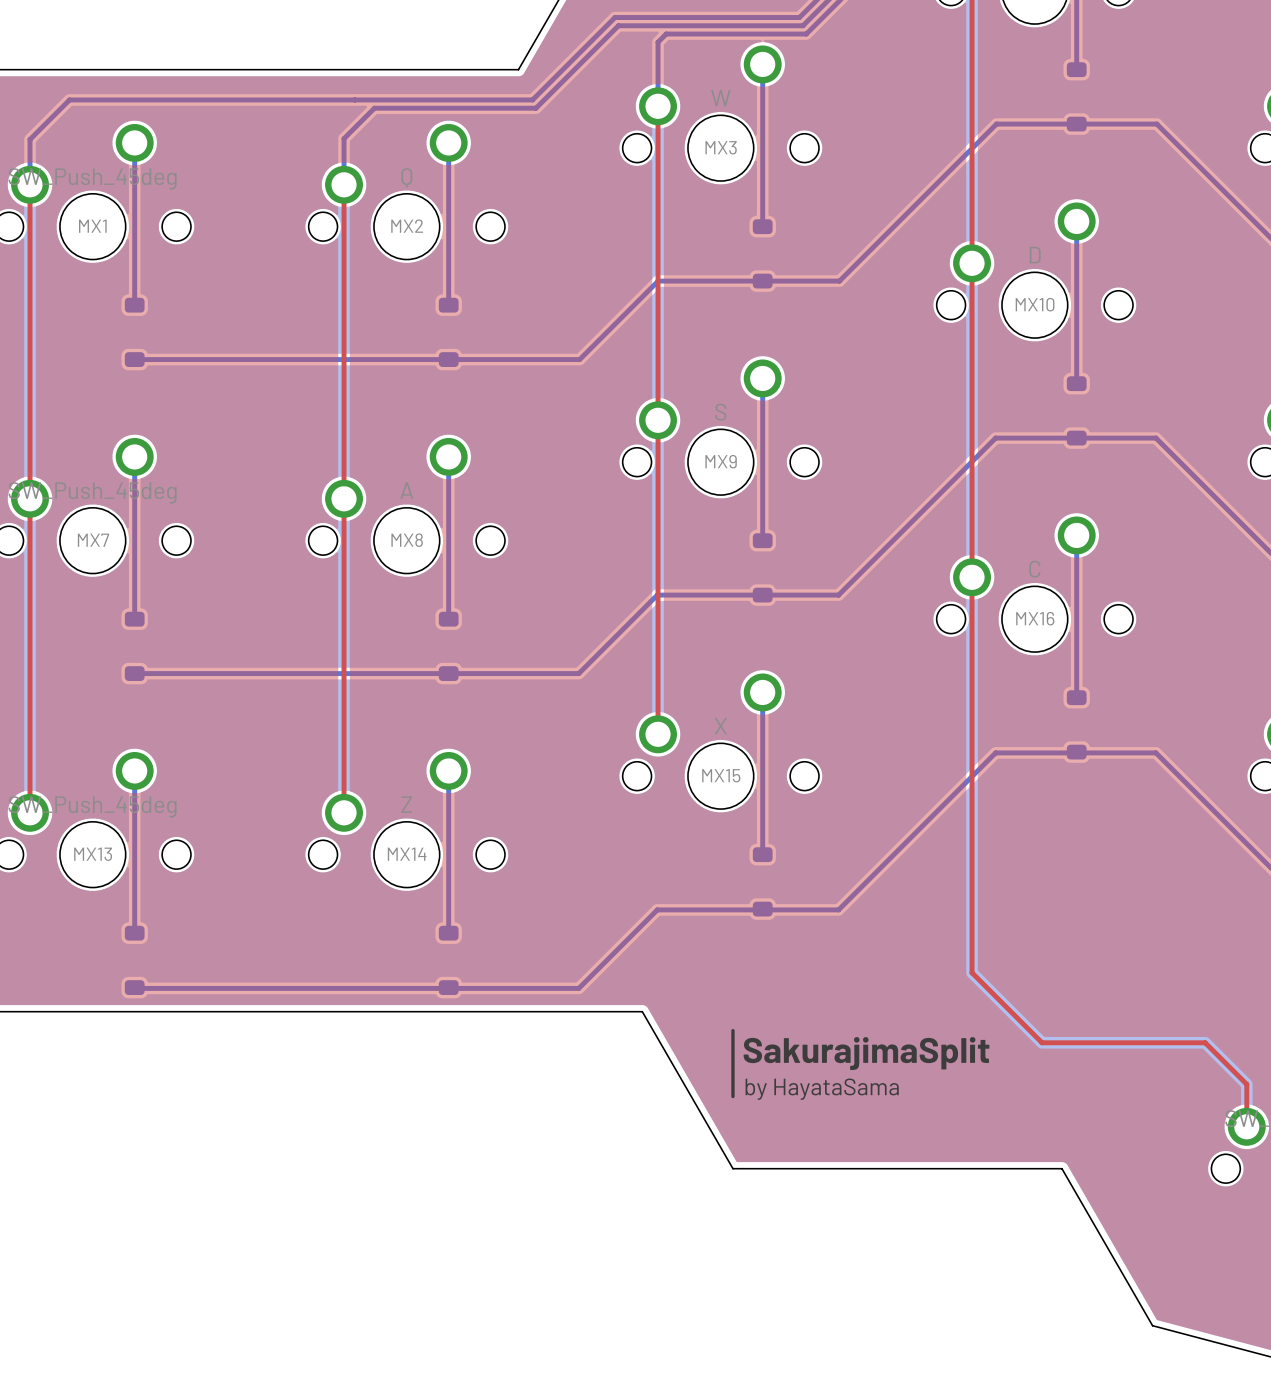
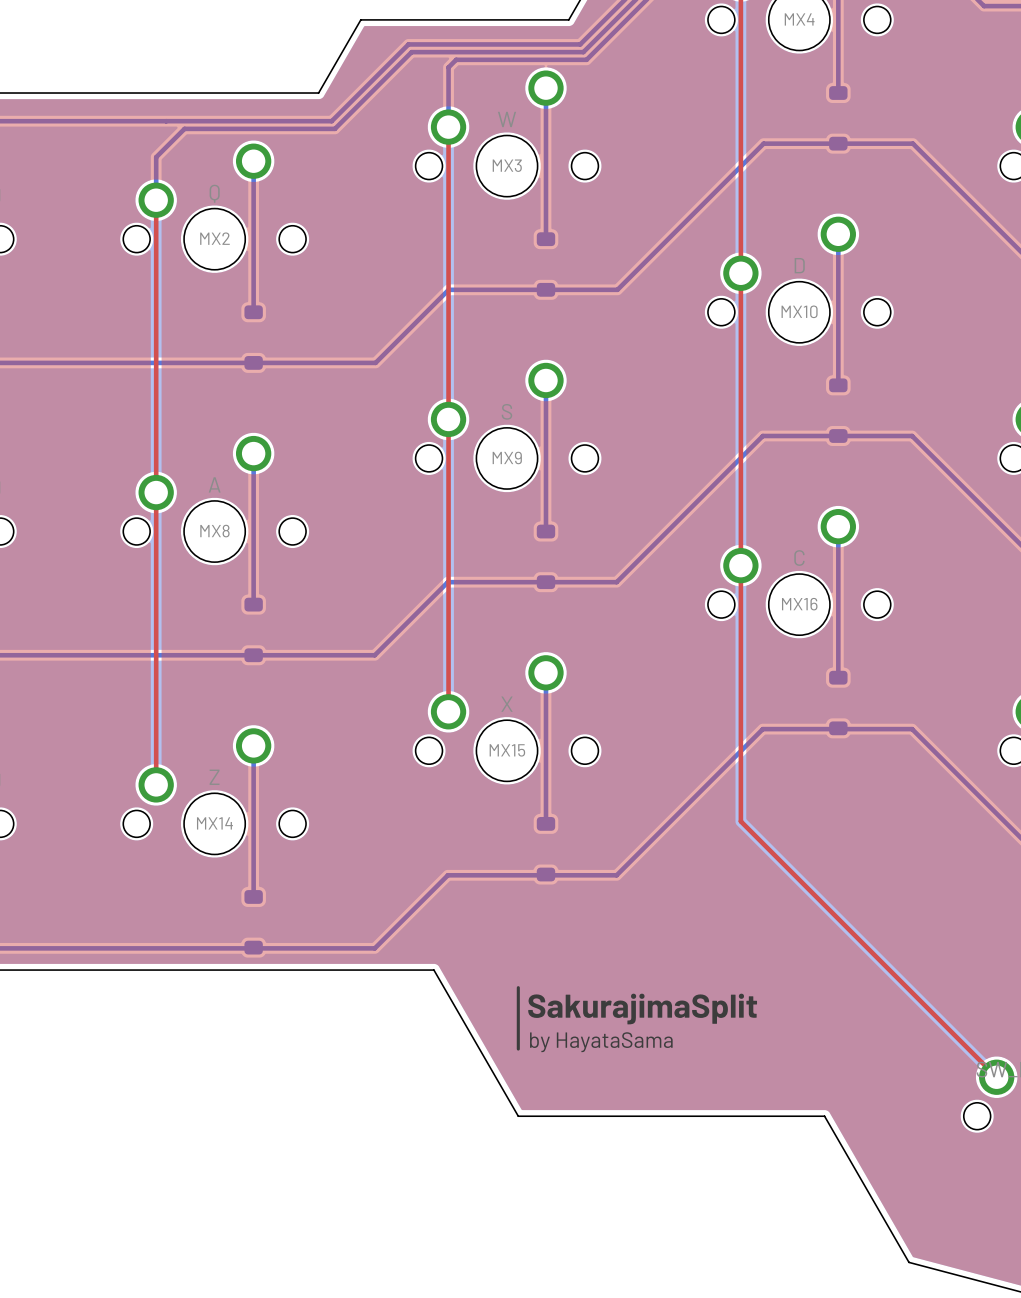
top track: (972, 852) (972, 972) (1042, 1042) (1205, 1042) (1246, 1084) (1246, 1126) -> (740, 821) (996, 1077)

